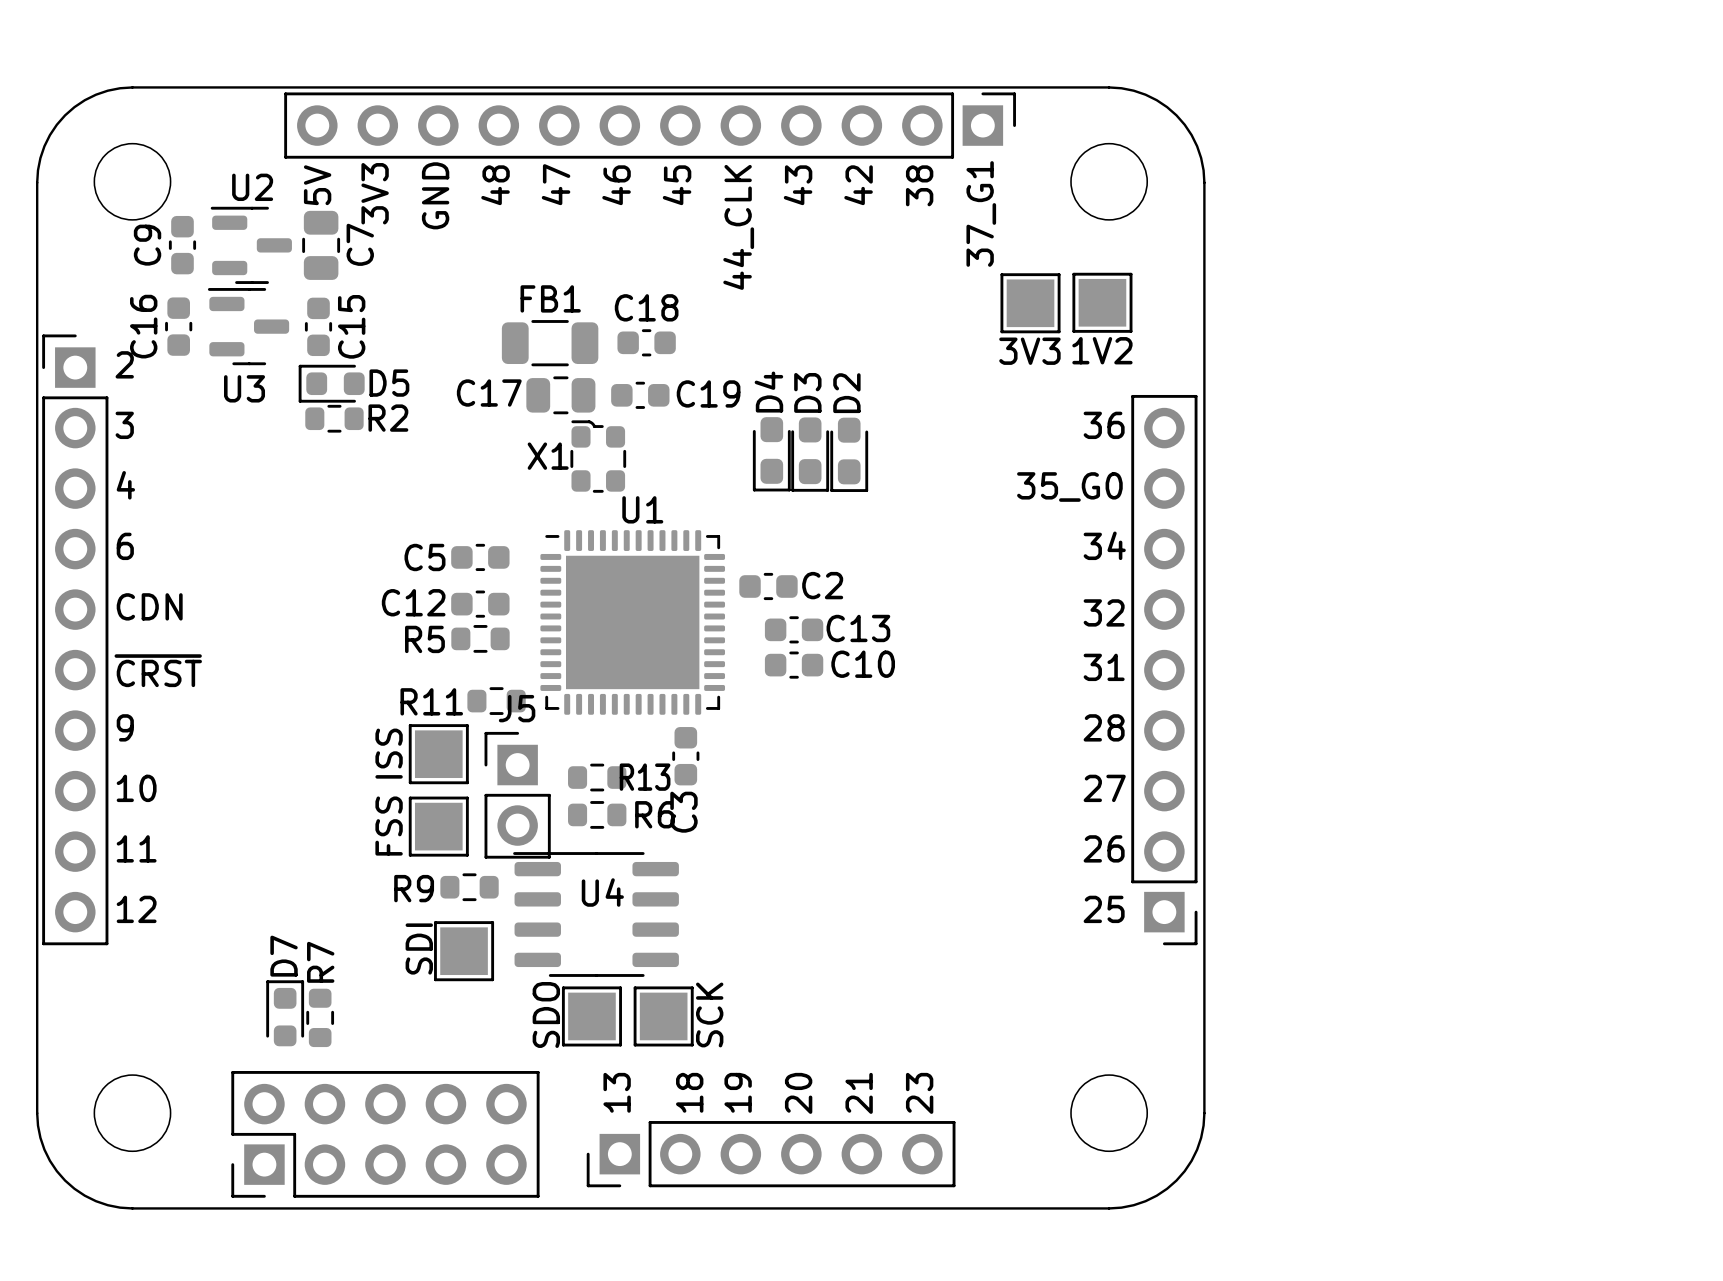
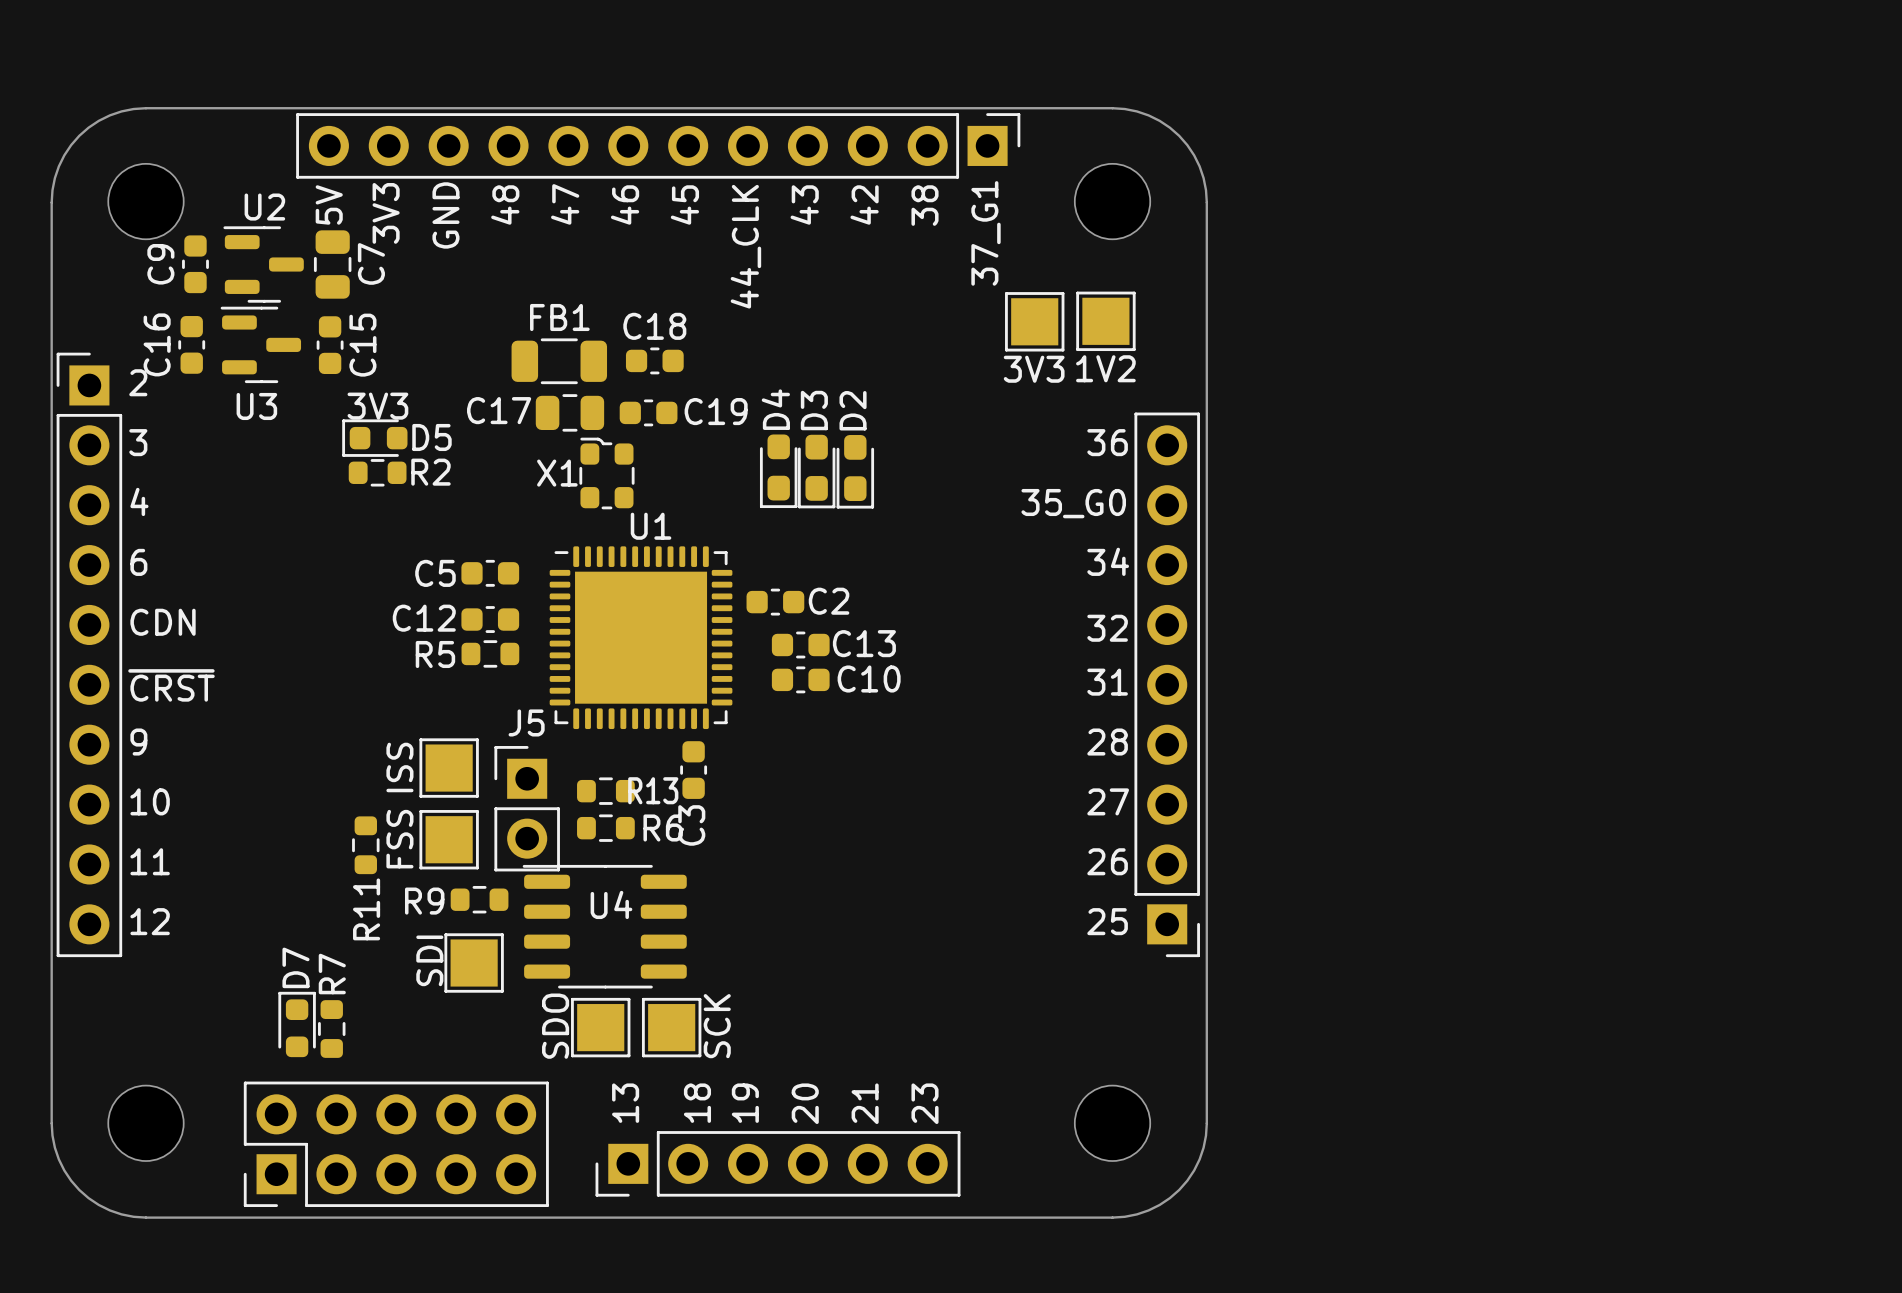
D5 position: (331, 383) -> (374, 438)
text: none -> 3V3 (377, 406)
R2 position: (334, 418) -> (377, 472)
R11 name position: R11 (431, 701) -> R11 (366, 909)
R11 rotation: 0° (496, 701) -> 90° clockwise (365, 845)
R11 position: (496, 701) -> (365, 845)

